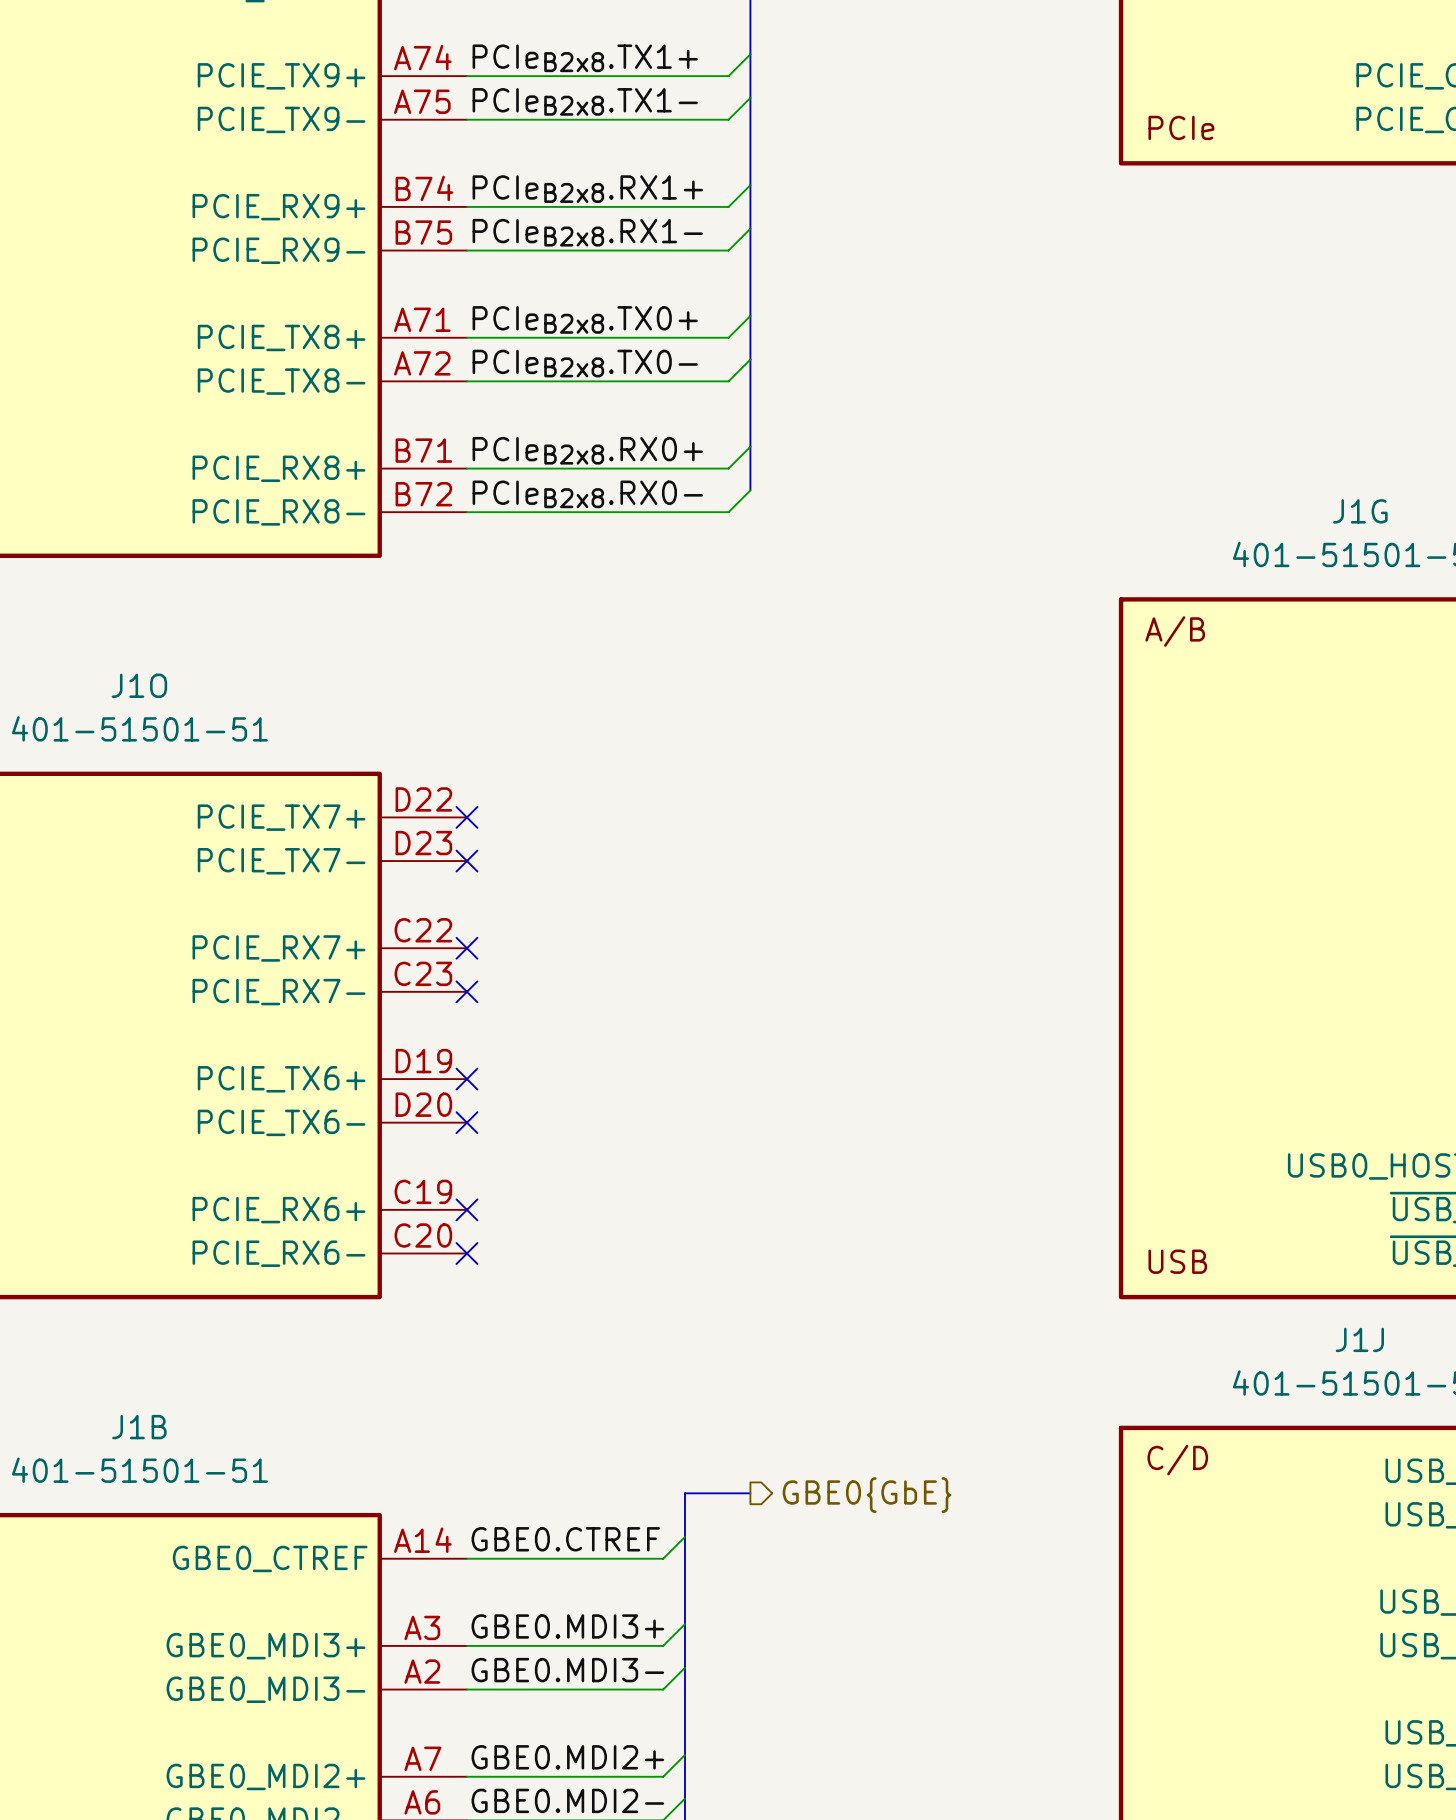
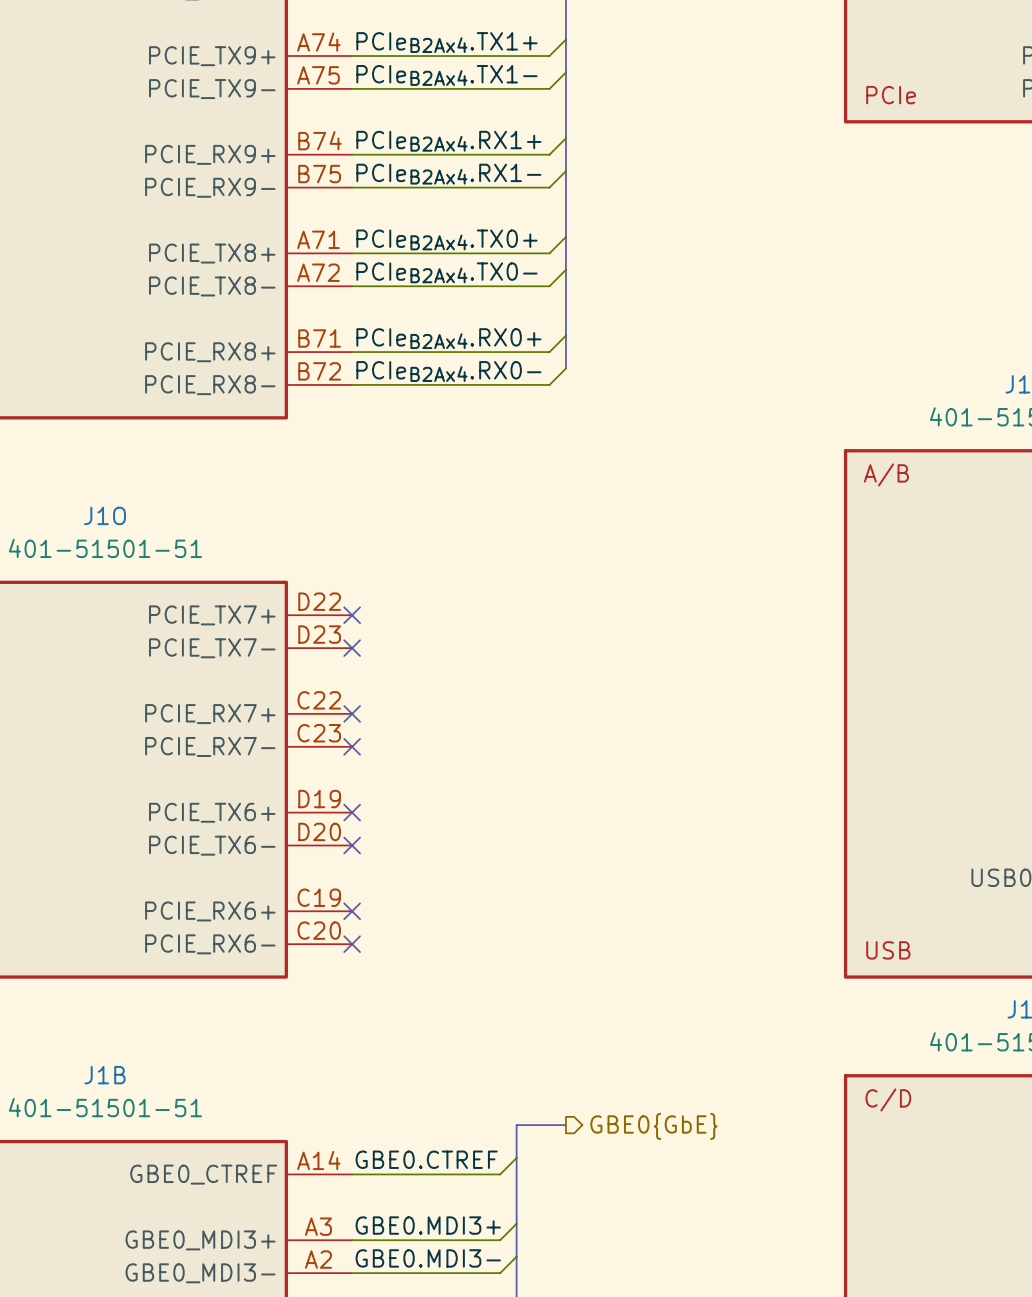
label: PCIeB2x8.TX1+ (585, 58) -> PCIeB2Ax4.TX1+ (446, 42)
label: PCIeB2x8.TX1- (585, 101) -> PCIeB2Ax4.TX1- (446, 75)
label: PCIeB2x8.RX1+ (587, 189) -> PCIeB2Ax4.RX1+ (448, 141)
label: PCIeB2x8.RX1- (587, 232) -> PCIeB2Ax4.RX1- (448, 174)
label: PCIeB2x8.TX0+ (585, 319) -> PCIeB2Ax4.TX0+ (446, 239)
label: PCIeB2x8.TX0- (585, 363) -> PCIeB2Ax4.TX0- (446, 272)
label: PCIeB2x8.RX0+ (587, 450) -> PCIeB2Ax4.RX0+ (448, 338)
label: PCIeB2x8.RX0- (587, 494) -> PCIeB2Ax4.RX0- (448, 371)

